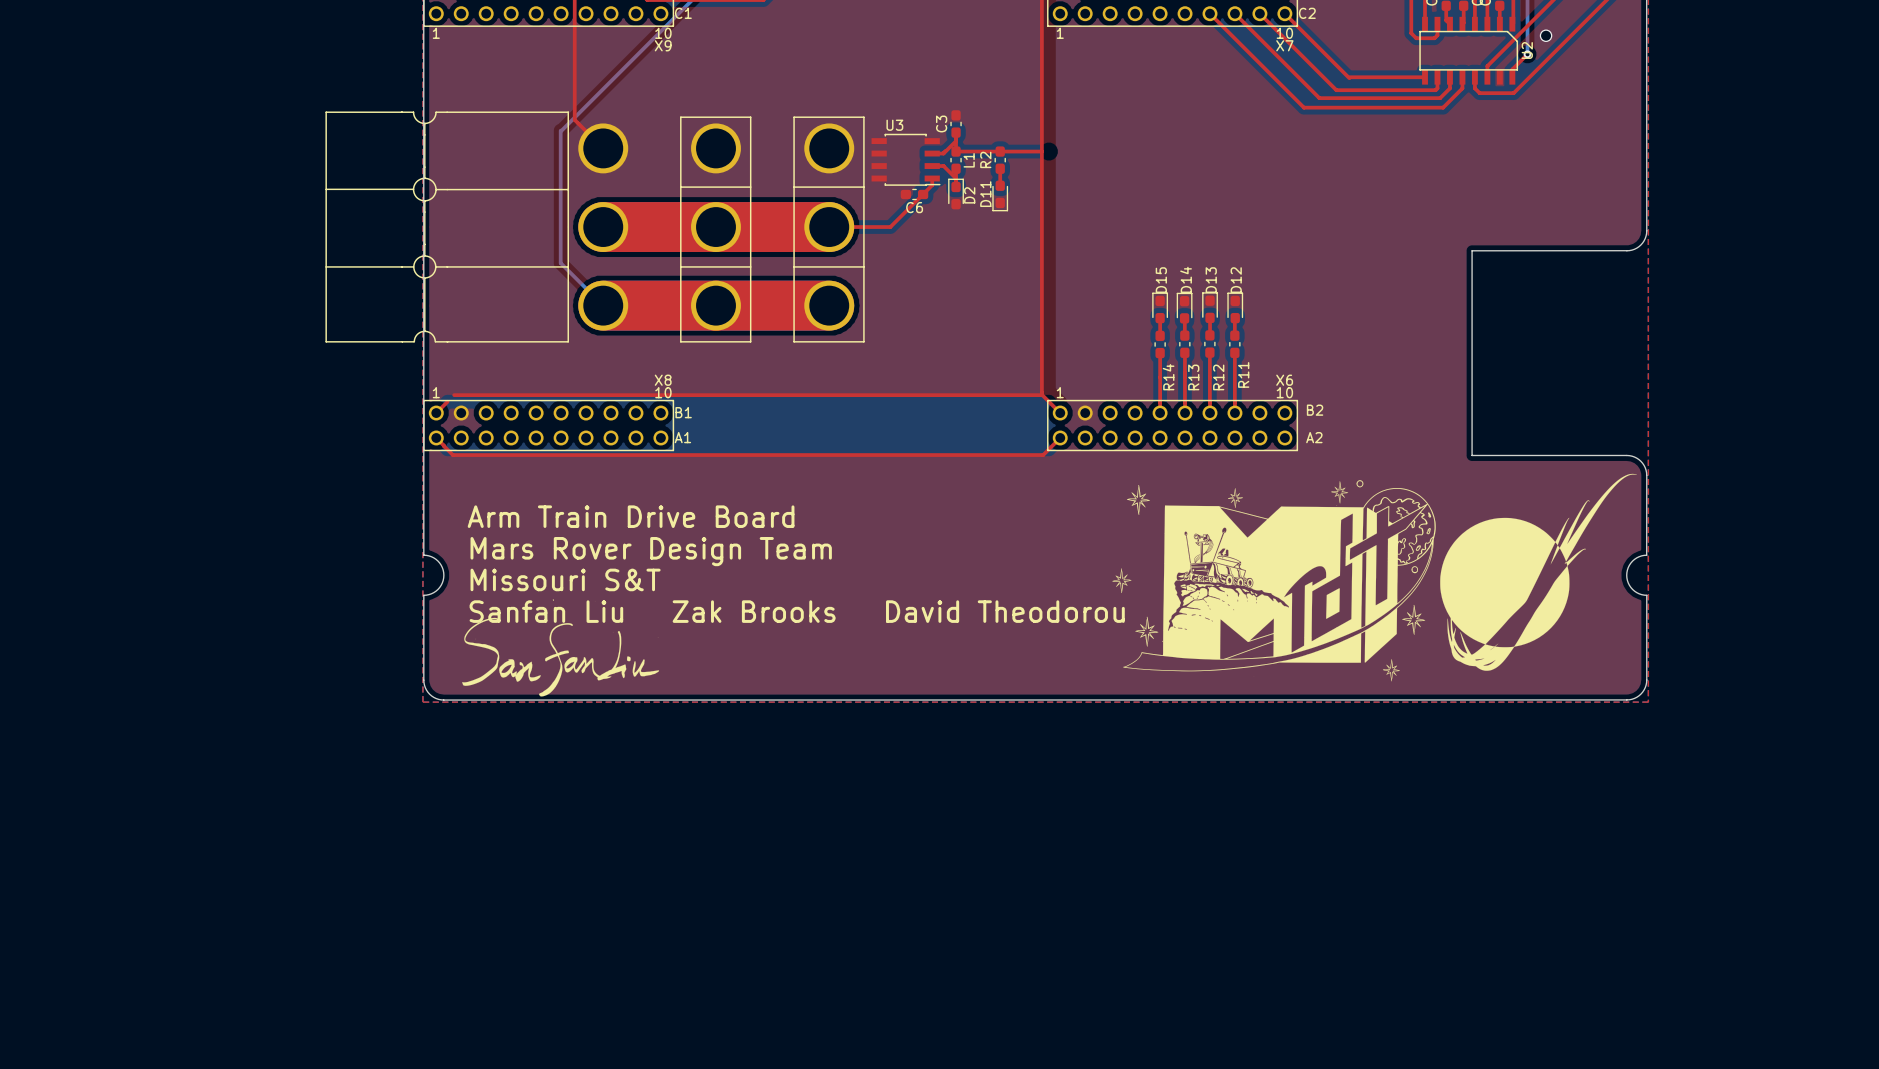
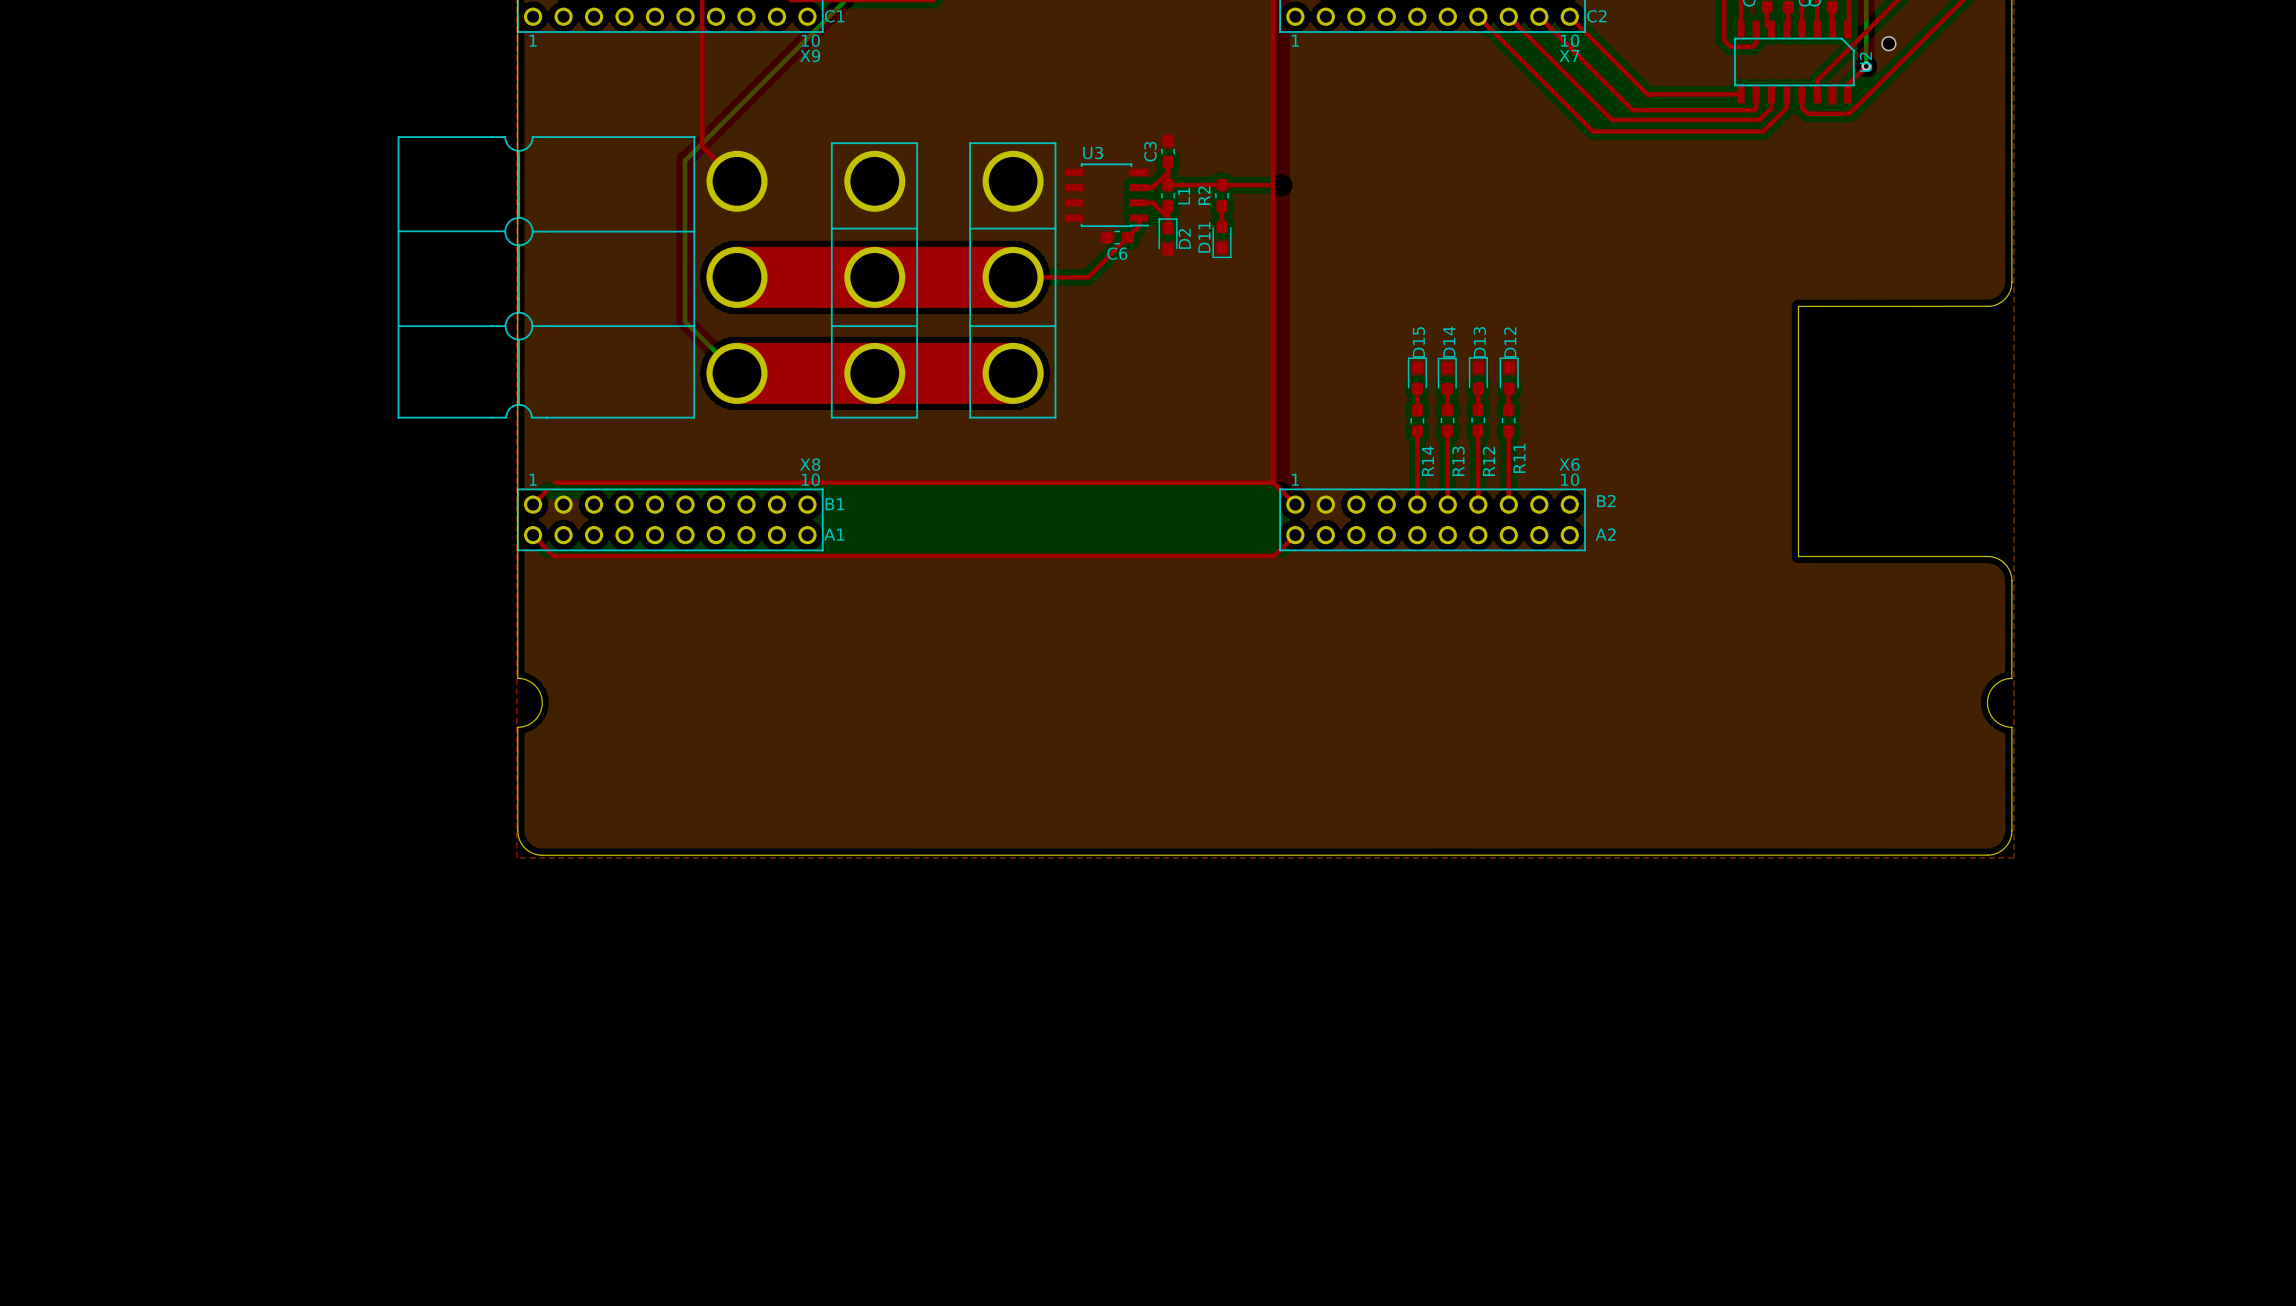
drawing: [1112, 473, 1638, 682] -> none
text: Arm Train Drive Board (631, 516) -> none
text: Mars Rover Design Team (651, 551) -> none
text: Missouri S&T (565, 579) -> none
drawing: [462, 599, 660, 697] -> none
text: Sanfan Liu Zak Brooks David Theodorou (797, 611) -> none

